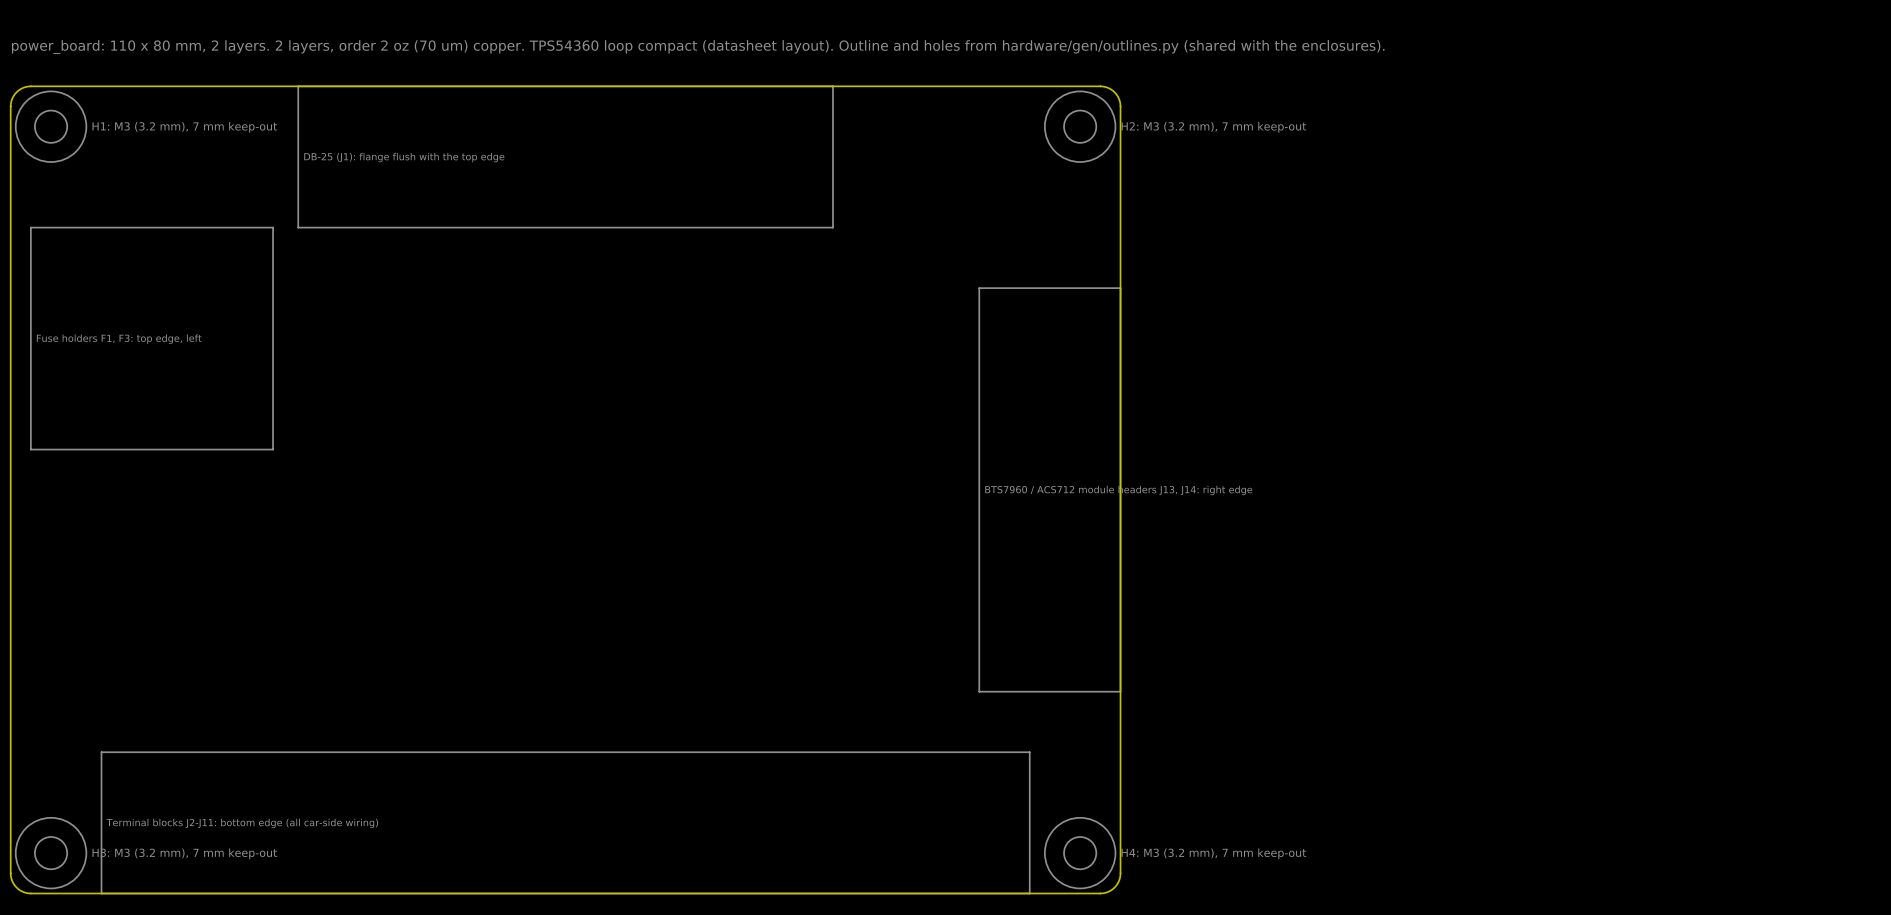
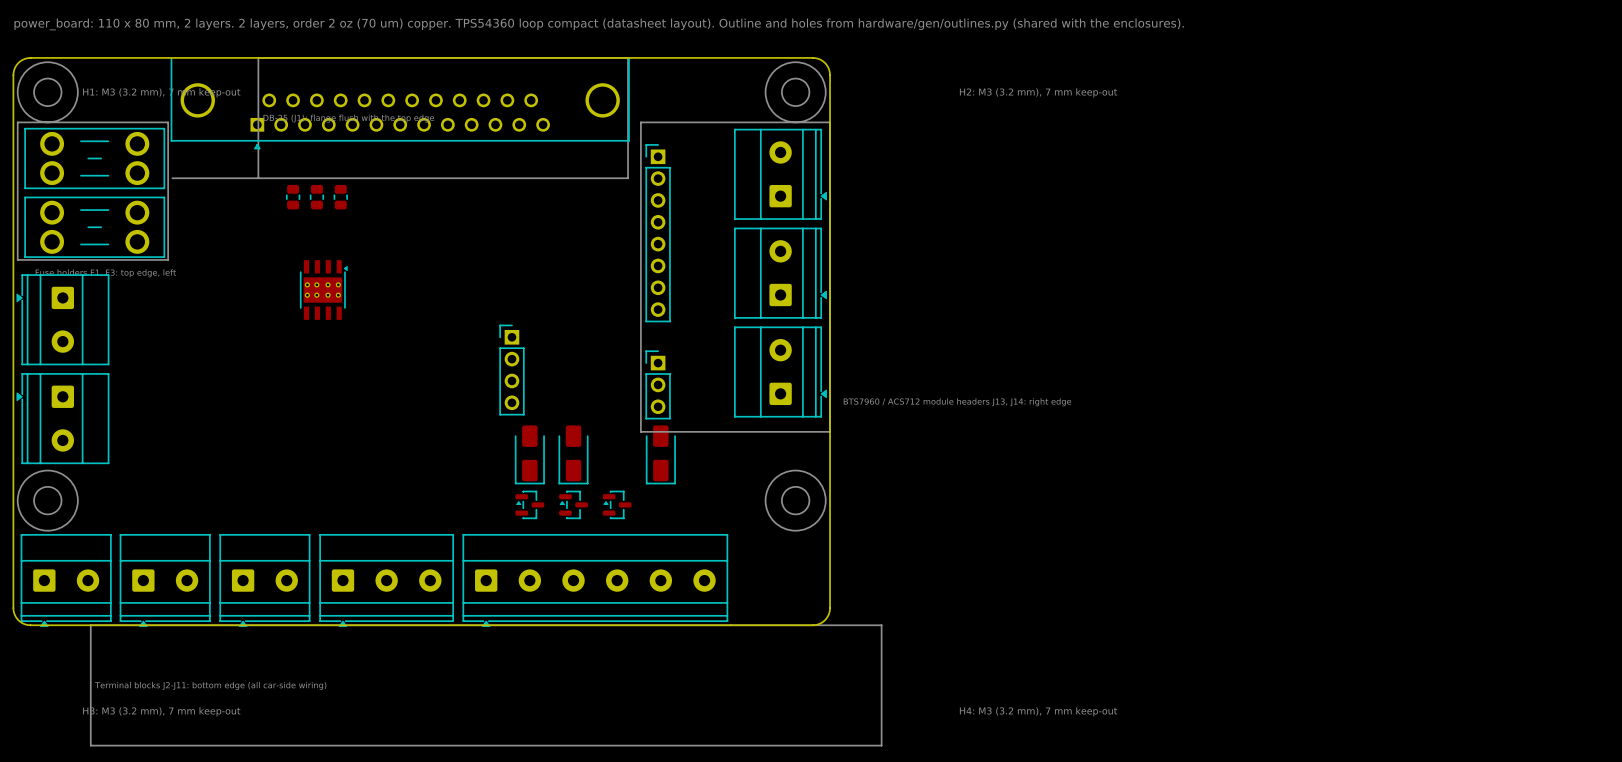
line: (732, 86) (832, 86) (832, 227) (732, 227) -> (628, 57) (628, 178)
board edge: (949, 86) (1102, 86) (1114, 92) (1119, 101) (1120, 873) (1118, 881) (1112, 889) (1100, 893) (28, 893) (16, 887) (10, 875) (10, 732) -> (812, 57) (824, 62) (830, 75) (830, 608) (828, 614) (823, 621) (812, 625) (30, 625) (18, 620) (13, 608)
drawing position: (1080, 126) -> (795, 92)
drawing position: (1080, 126) -> (795, 92)
part: none -> (400, 103)
line: none -> (17, 122) (168, 122) (168, 259) (17, 259) (17, 122)
line: none -> (640, 122) (830, 122) (830, 431) (640, 431) (640, 122)
part: none -> (94, 158)
part: none -> (780, 174)
line: (197, 227) (30, 227) (30, 449) (273, 449) (273, 227) -> (258, 178) (236, 178)
part: none -> (293, 197)
part: none -> (316, 197)
part: none -> (340, 197)
part: none -> (94, 227)
line: (979, 288) (1120, 288) (1120, 691) (979, 691) (979, 288) -> none
part: none -> (658, 233)
part: none -> (780, 273)
part: none -> (323, 290)
part: none -> (62, 319)
part: none -> (511, 370)
part: none -> (780, 372)
part: none -> (658, 384)
part: none -> (62, 418)
part: none -> (529, 454)
part: none -> (573, 454)
part: none -> (660, 454)
drawing: none -> [765, 470, 827, 532]
part: none -> (529, 504)
part: none -> (573, 504)
part: none -> (617, 504)
part: none -> (66, 580)
part: none -> (165, 580)
part: none -> (264, 580)
part: none -> (386, 580)
part: none -> (595, 580)
drawing: [1044, 817, 1116, 889] -> none
drawing position: (51, 853) -> (47, 500)
drawing position: (51, 853) -> (47, 500)

